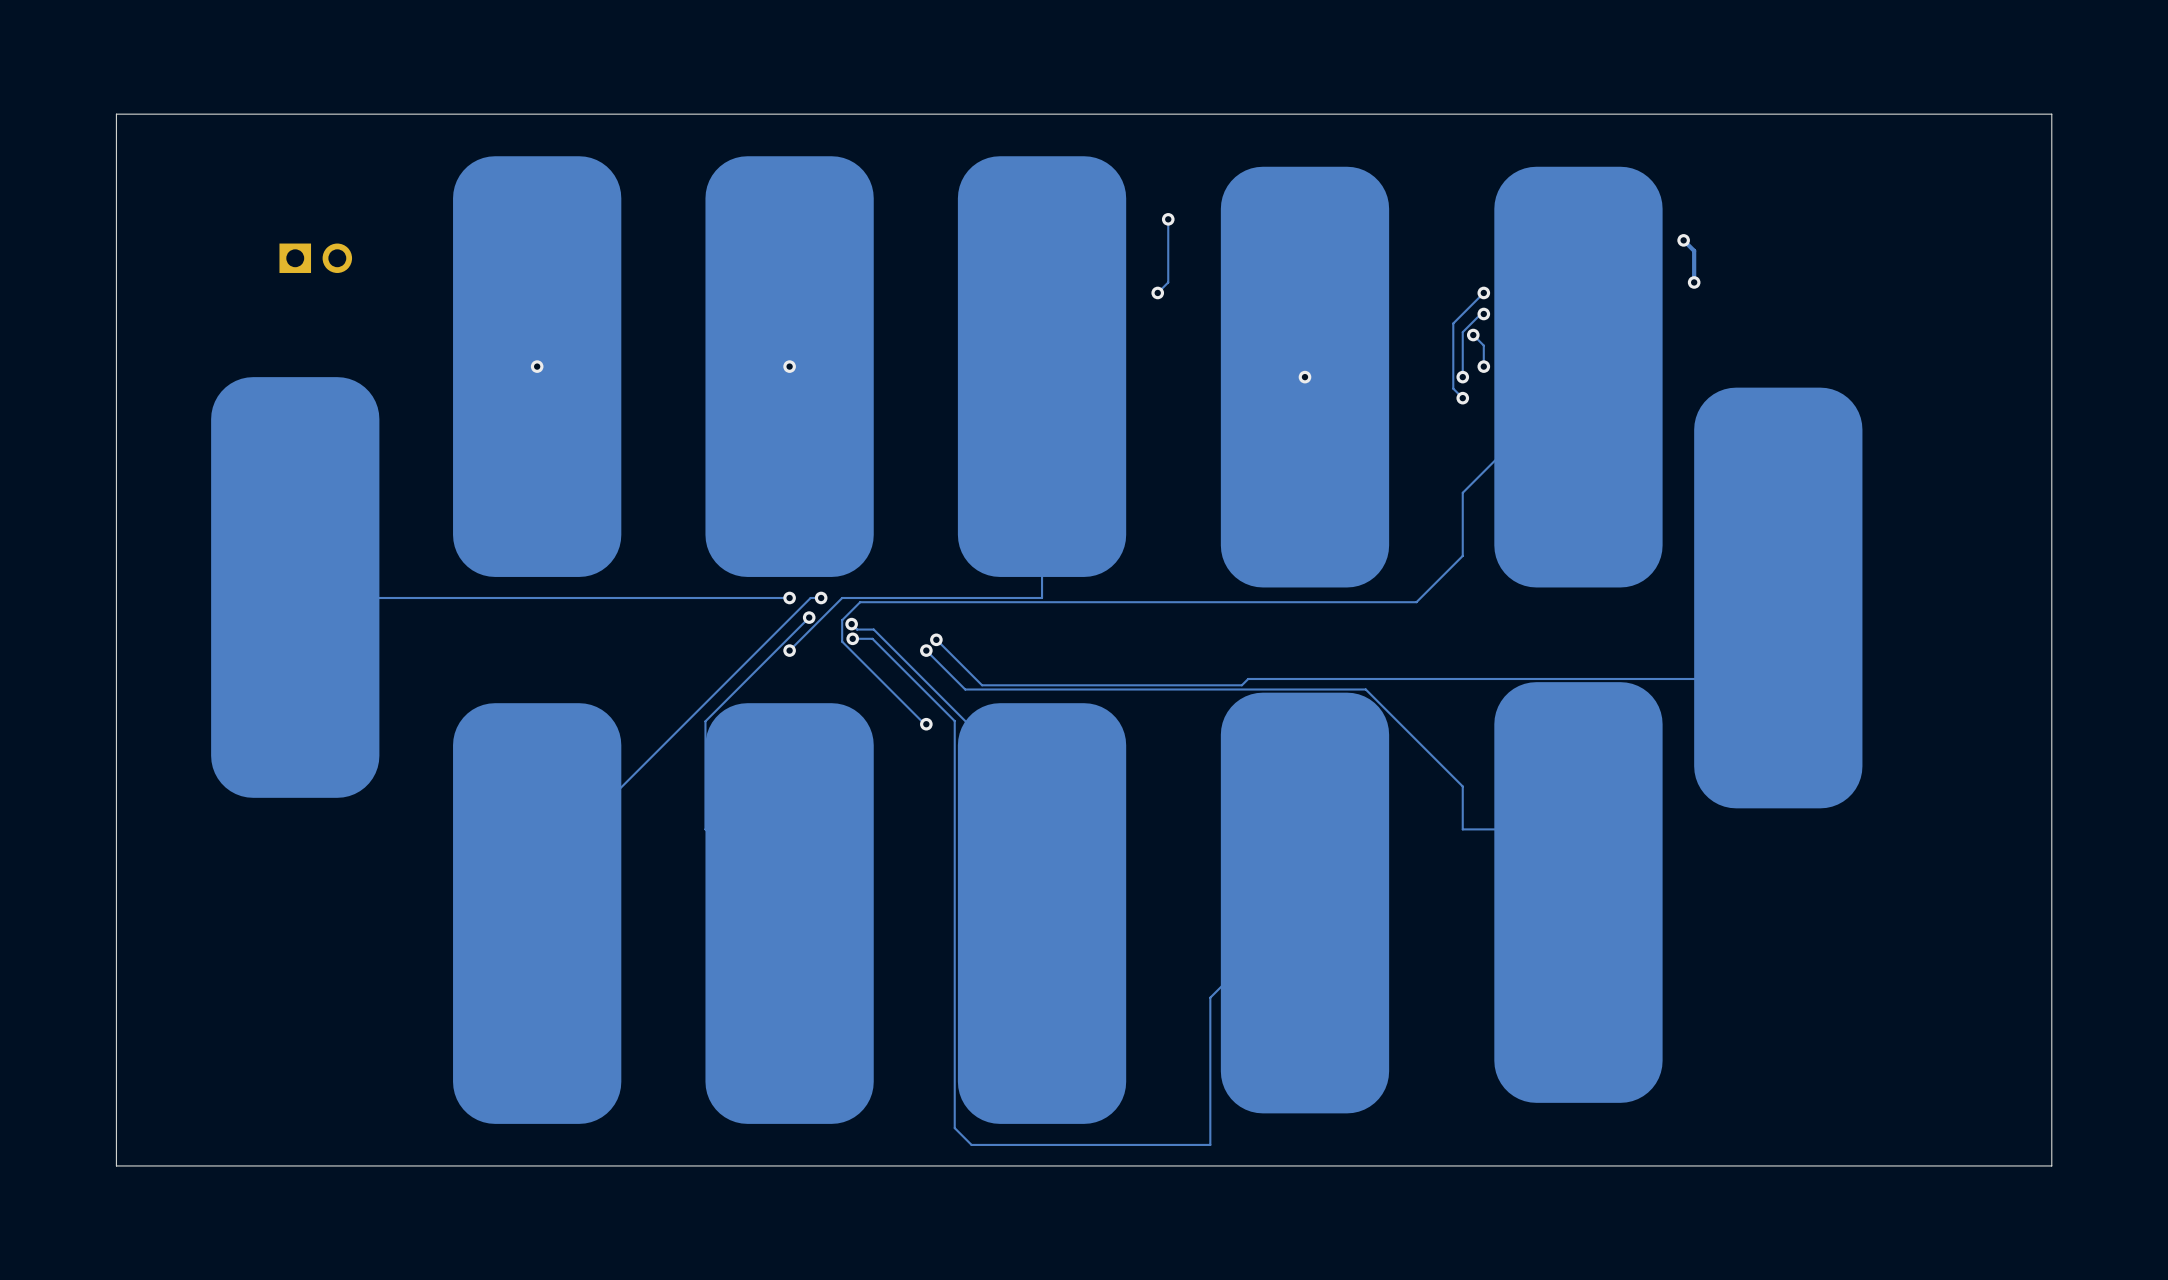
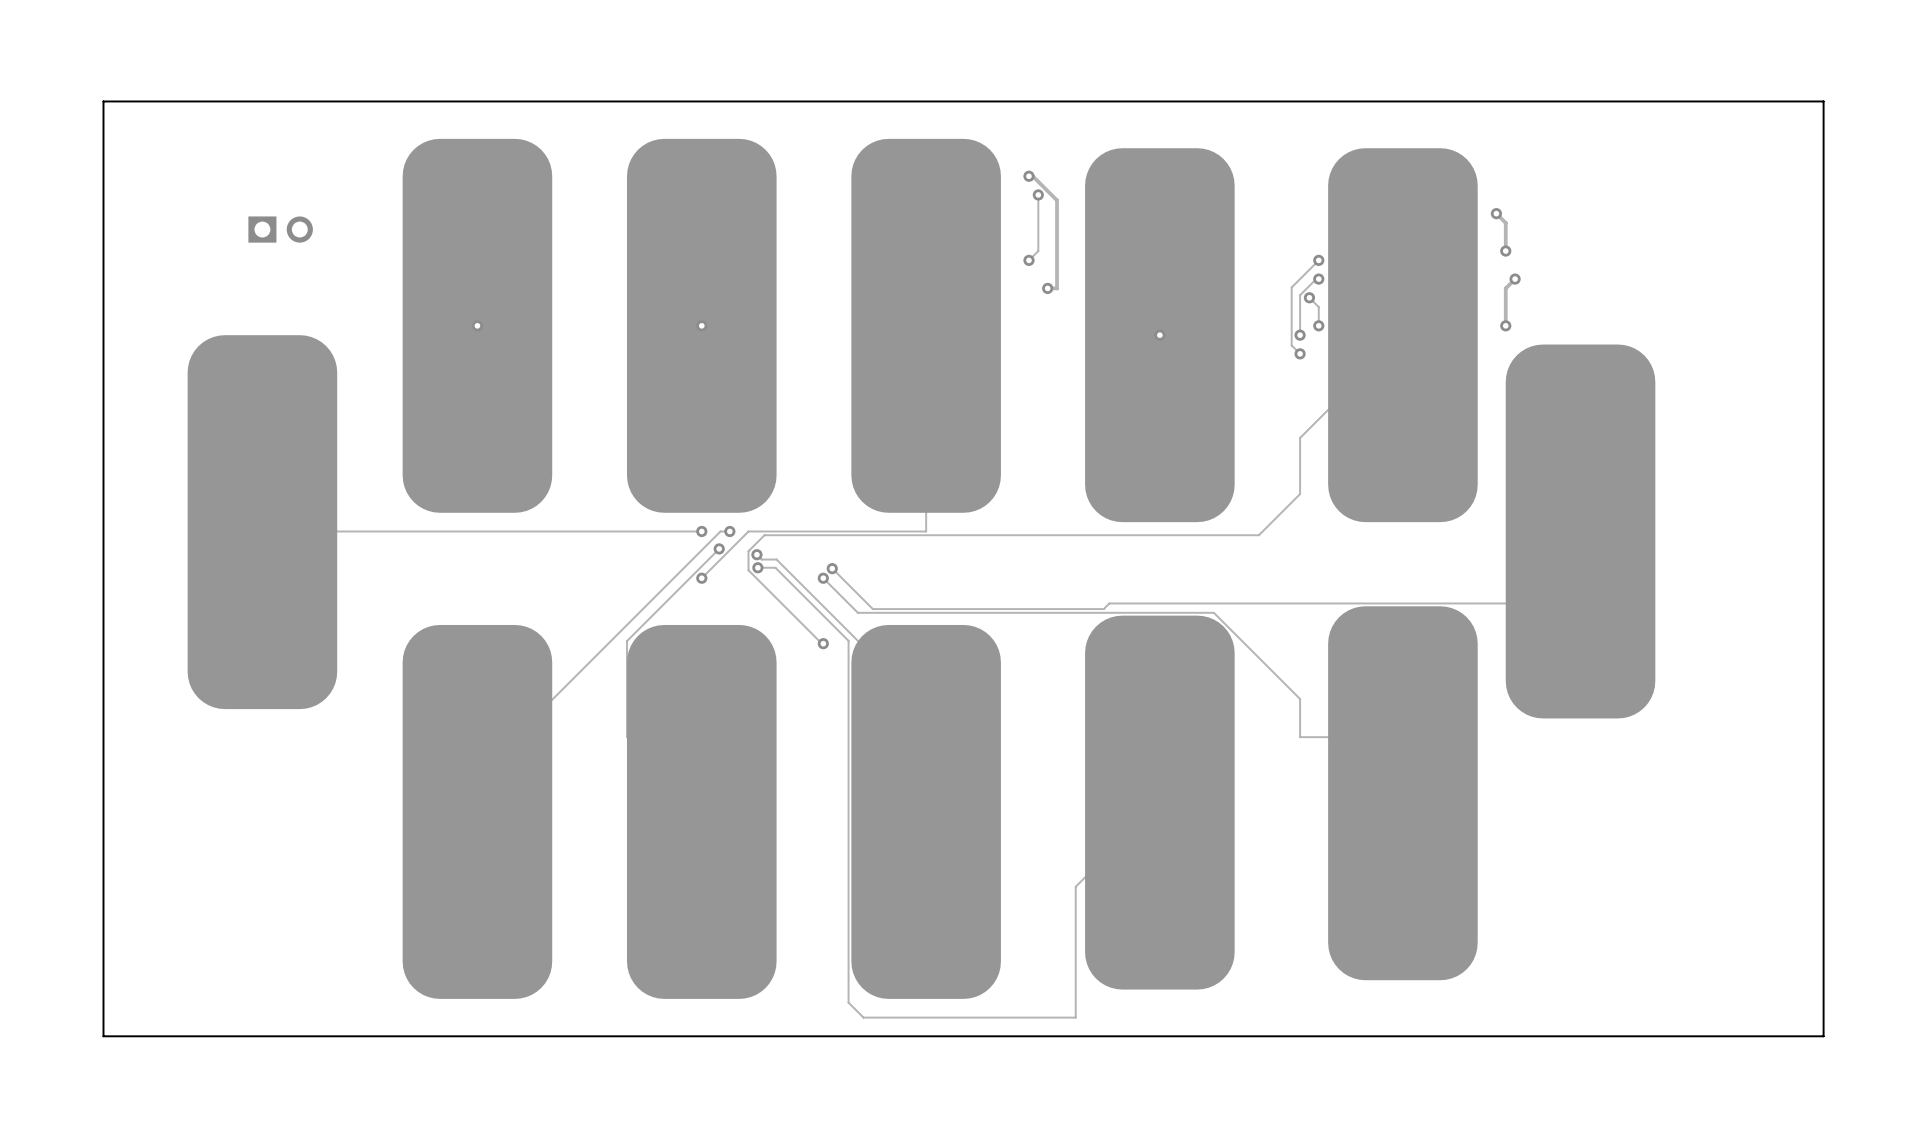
track: none -> (1028, 176) (1032, 176) (1057, 200) (1057, 288) (1047, 288)
via: none -> (1028, 176)
track: none -> (1515, 279) (1505, 288) (1505, 325)
via: none -> (1515, 279)
via: none -> (1047, 288)
via: none -> (1505, 325)

